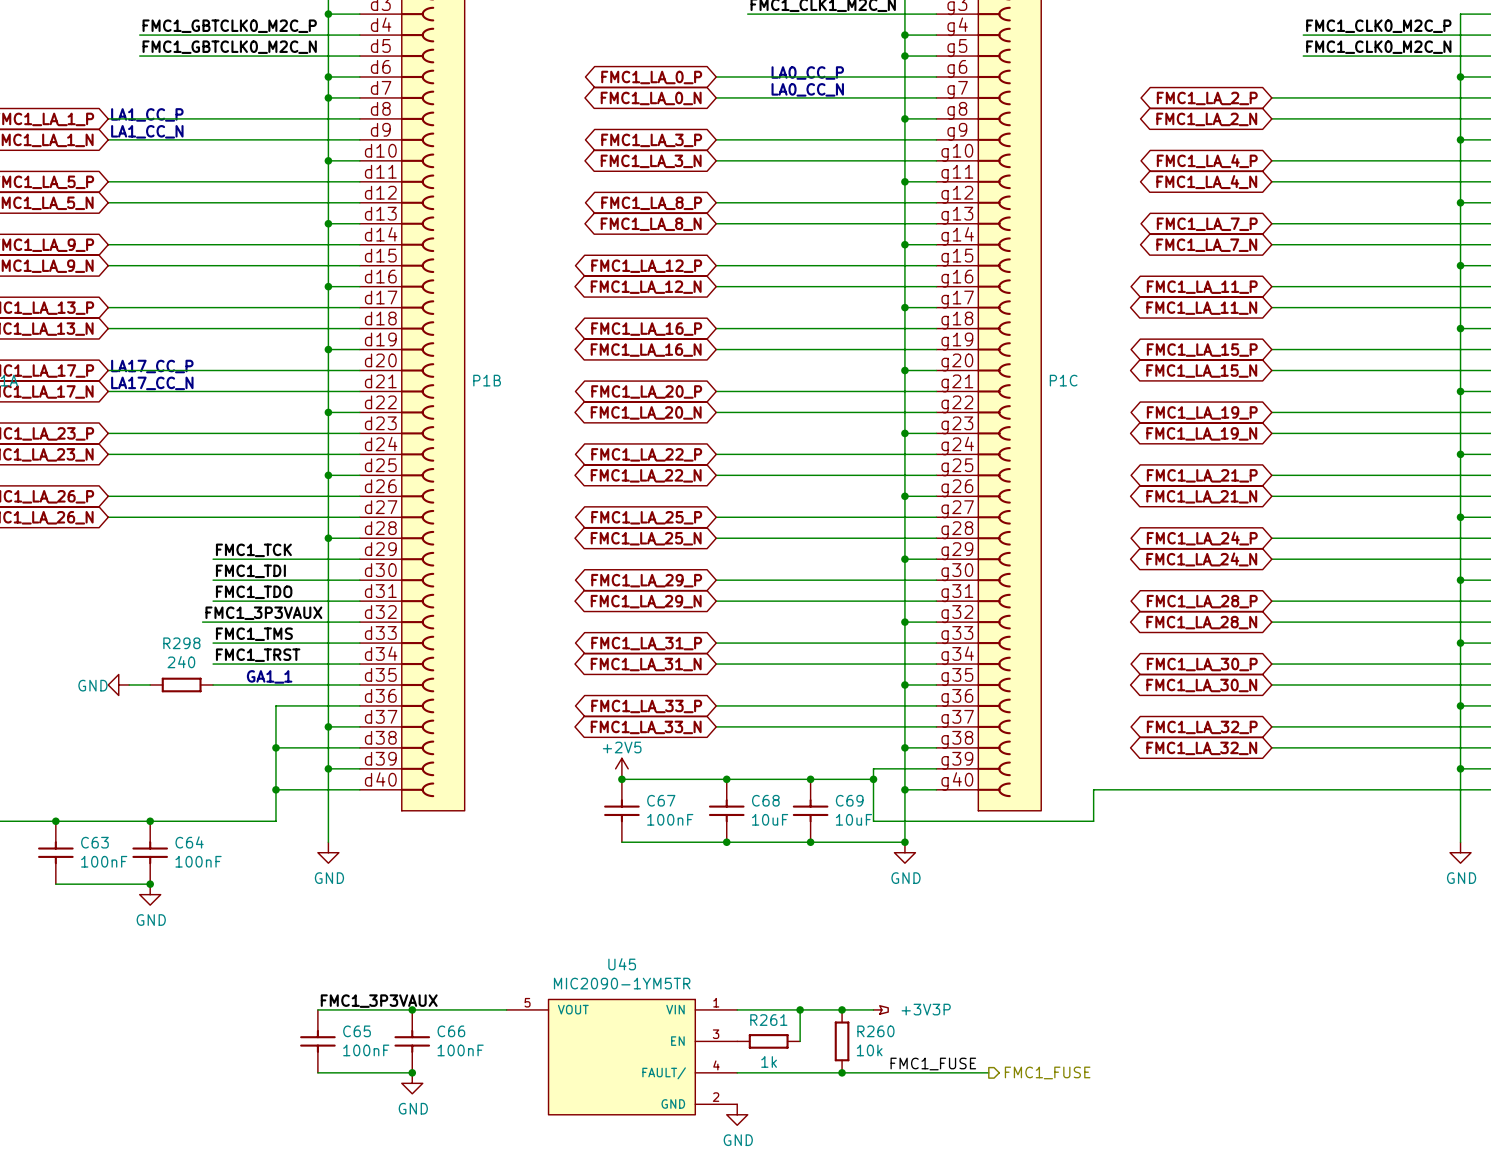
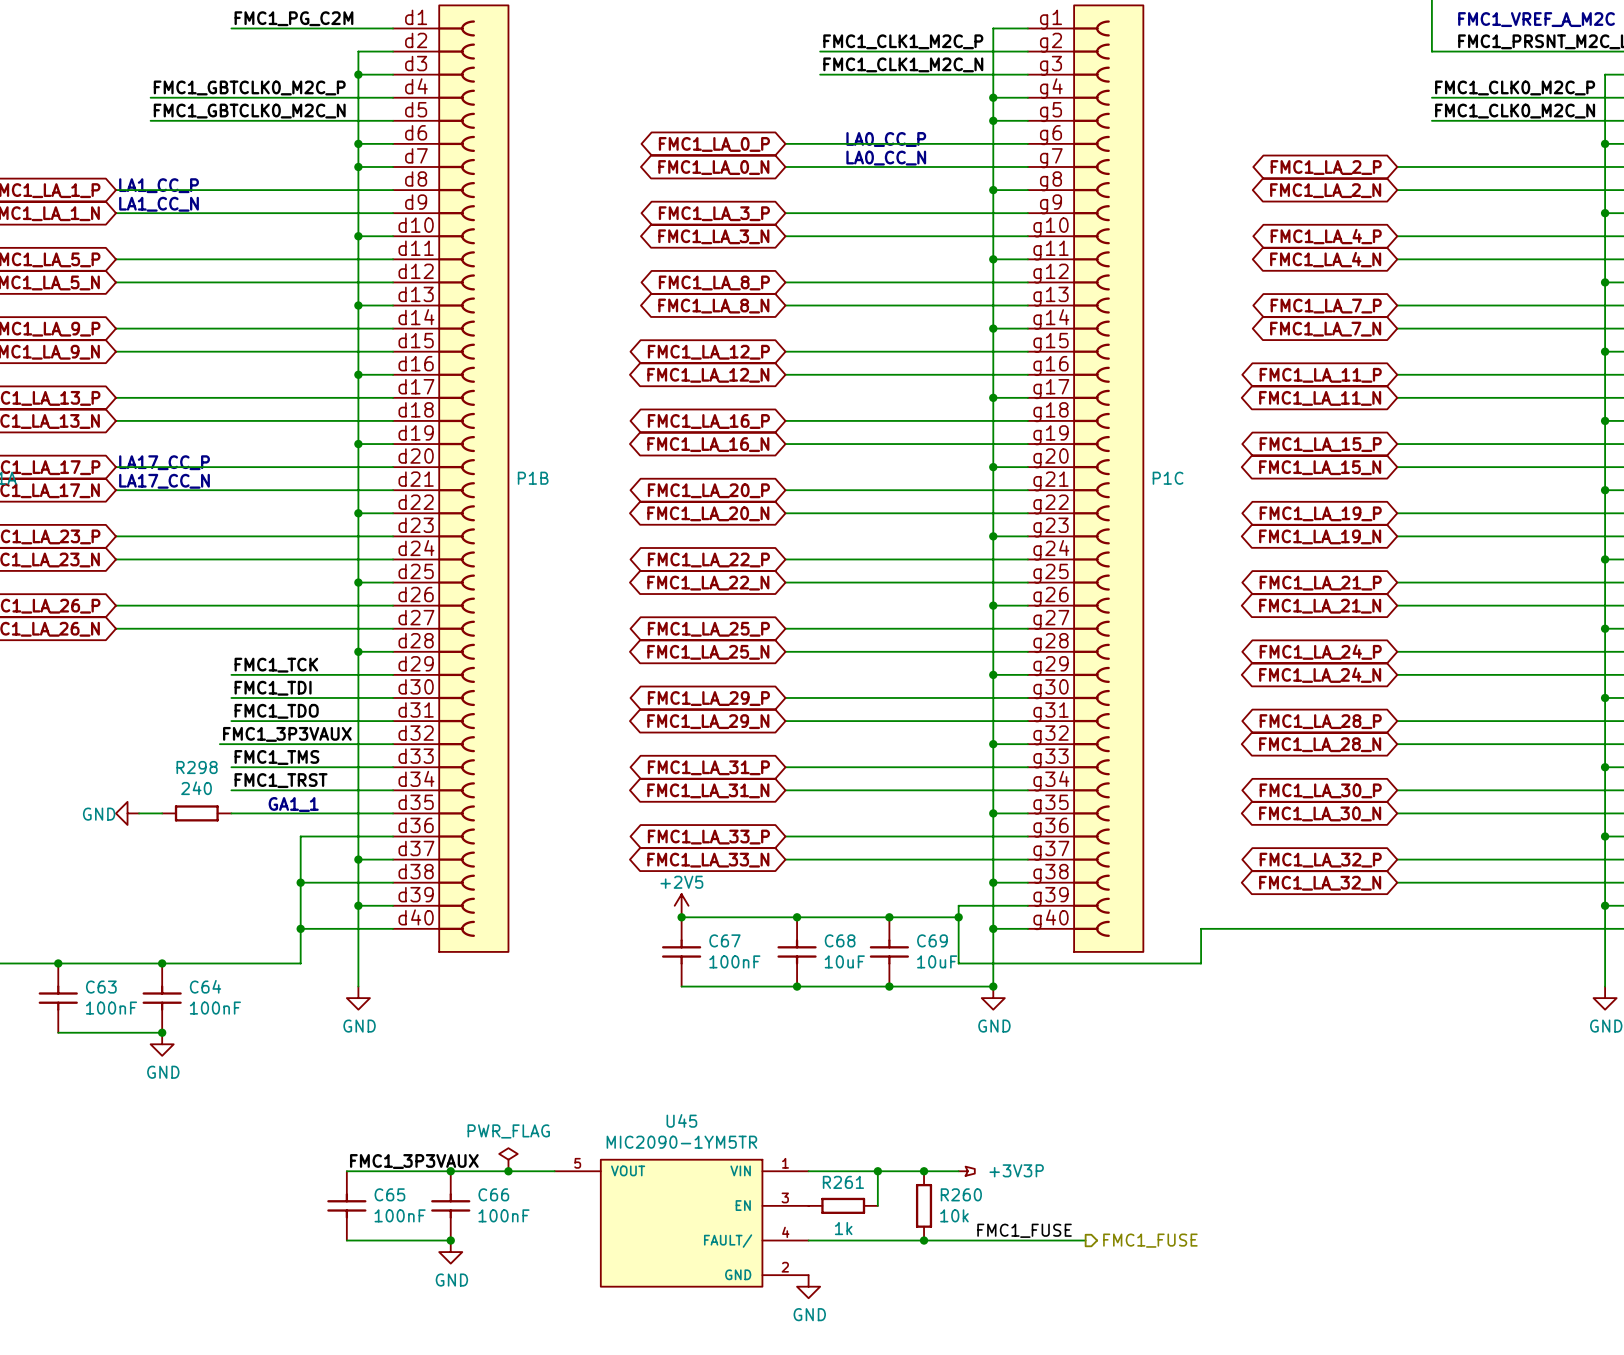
power symbol: none -> PWR_FLAG (508, 1159)
junction: none -> (508, 1171)

